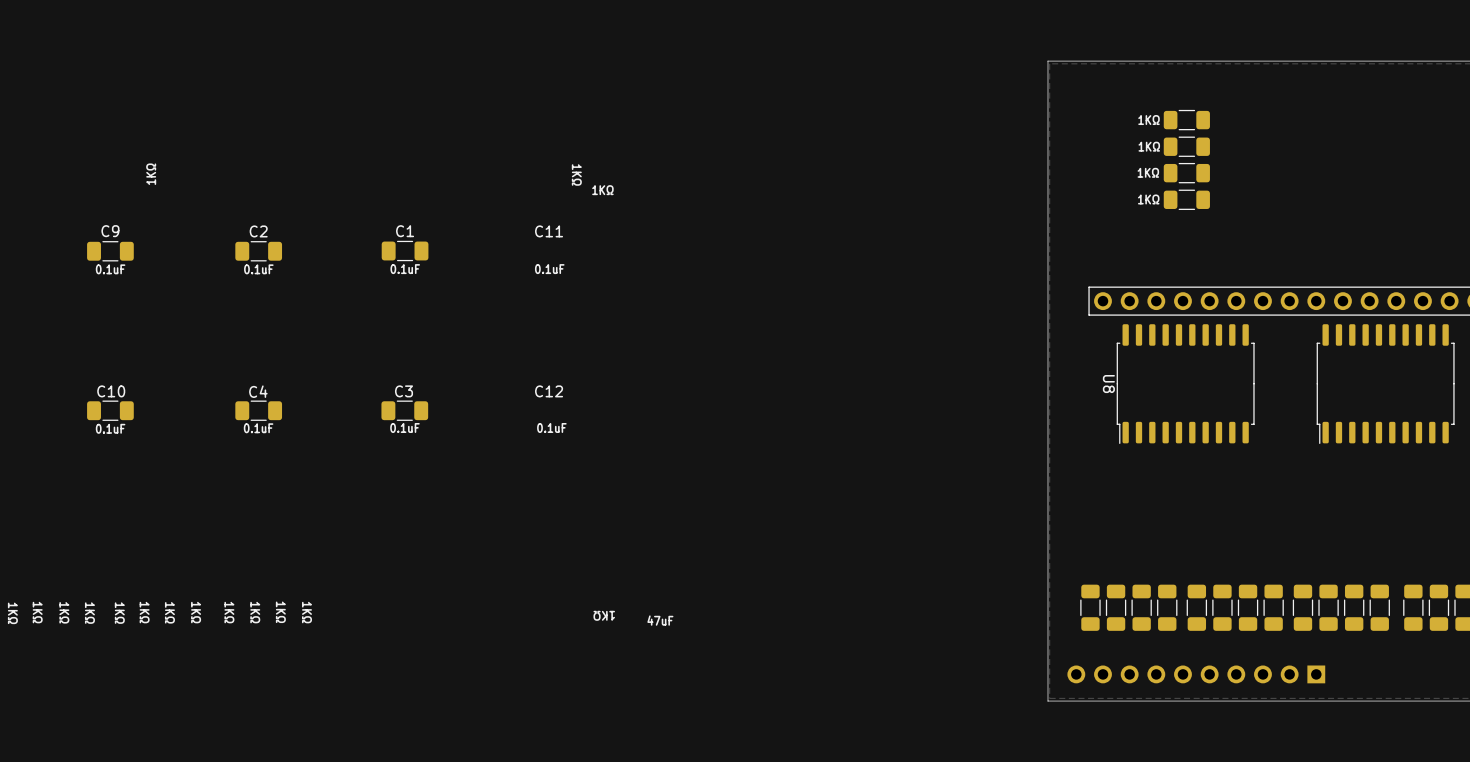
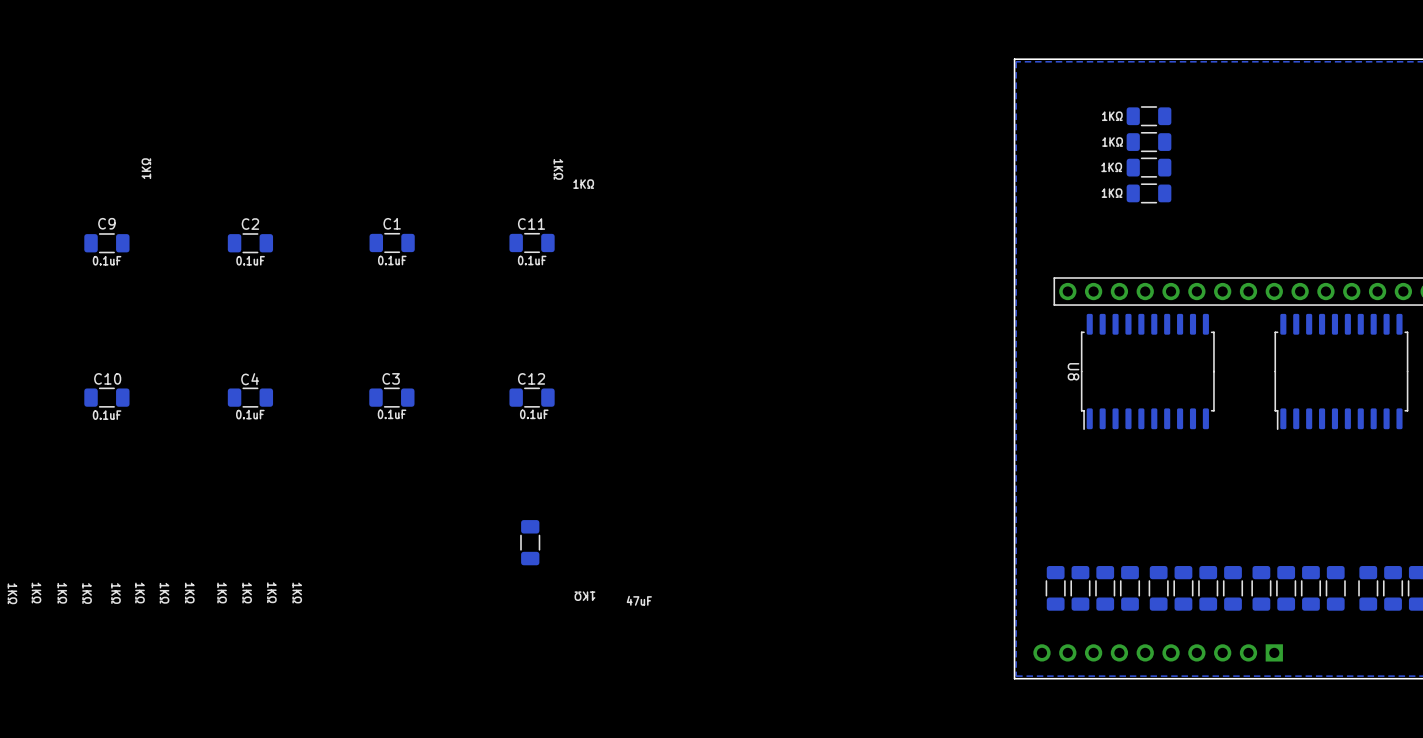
part: none -> (532, 242)
part: none -> (532, 397)
part: none -> (530, 542)

